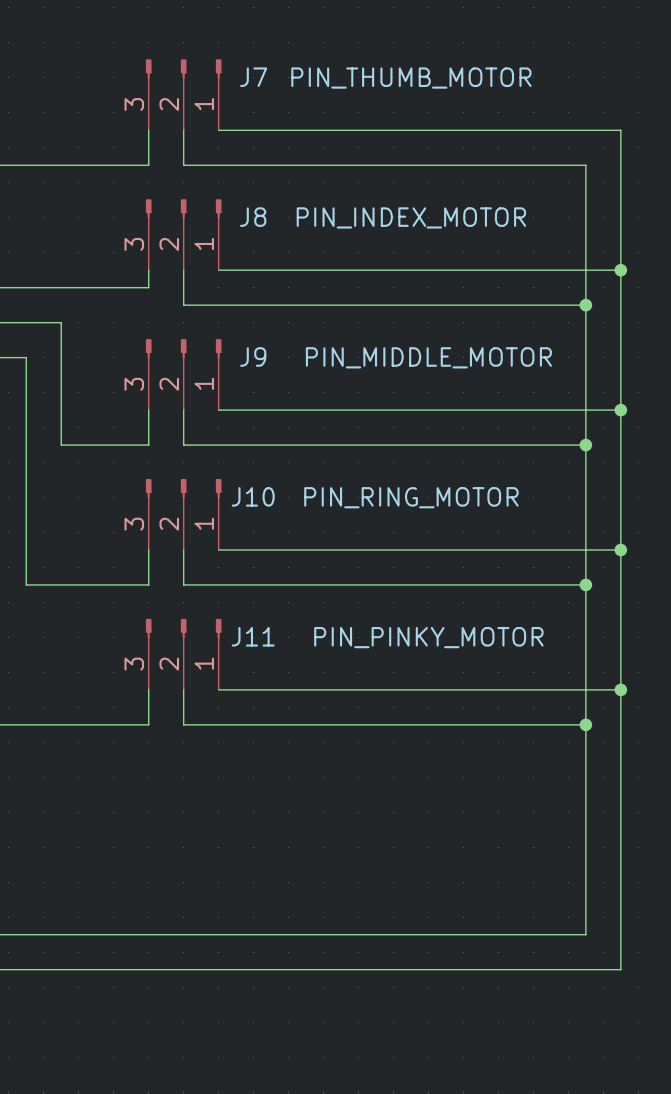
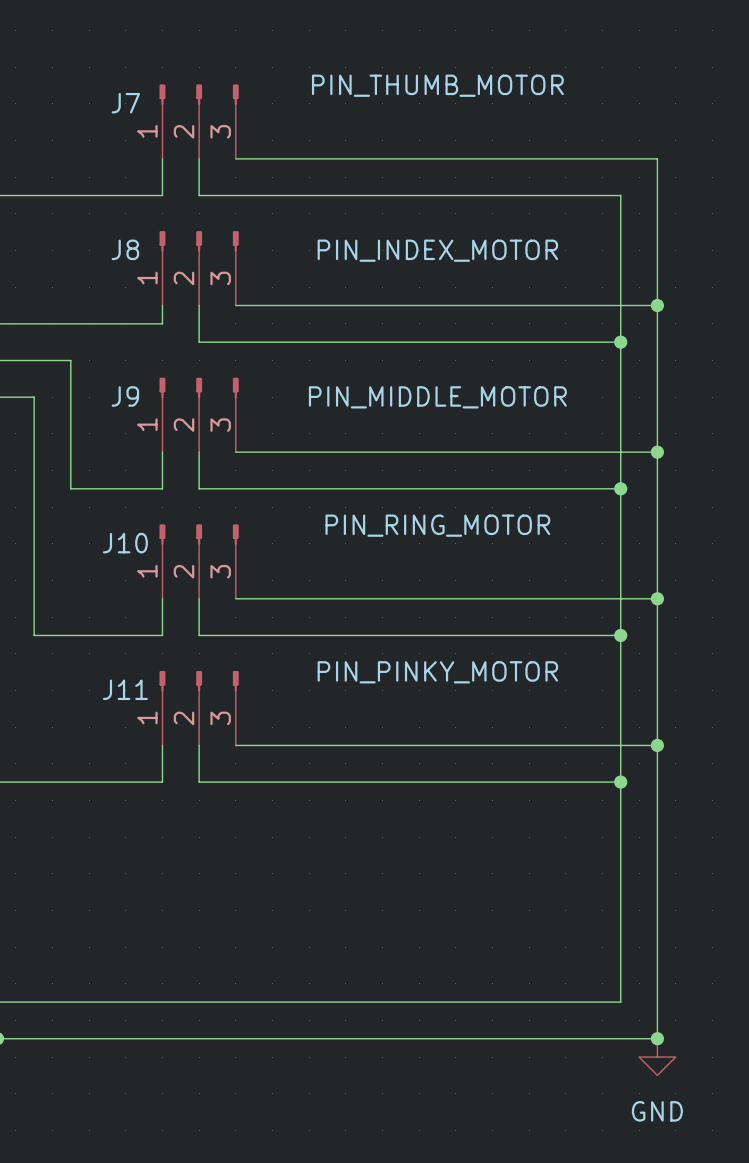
J7 flip: as is (183, 69) -> left-right (199, 94)
J8 flip: as is (183, 209) -> left-right (199, 241)
J9 flip: as is (183, 348) -> left-right (199, 388)
J10 flip: as is (183, 488) -> left-right (199, 534)
J11 flip: as is (183, 628) -> left-right (199, 681)
junction: none -> (657, 1038)
power symbol: none -> GND (657, 1057)

